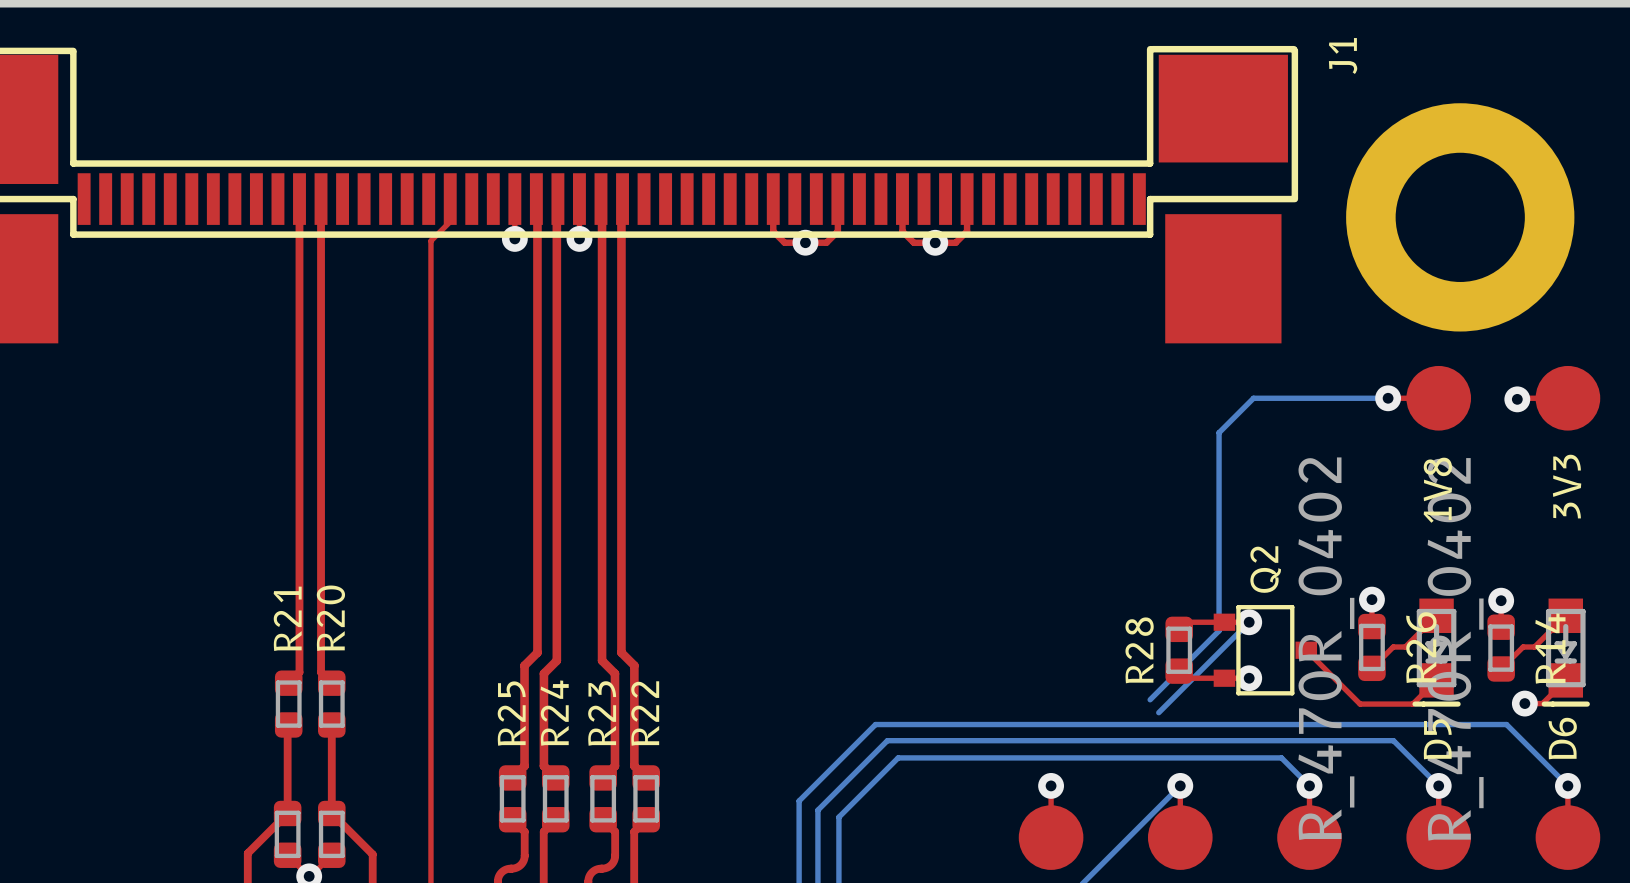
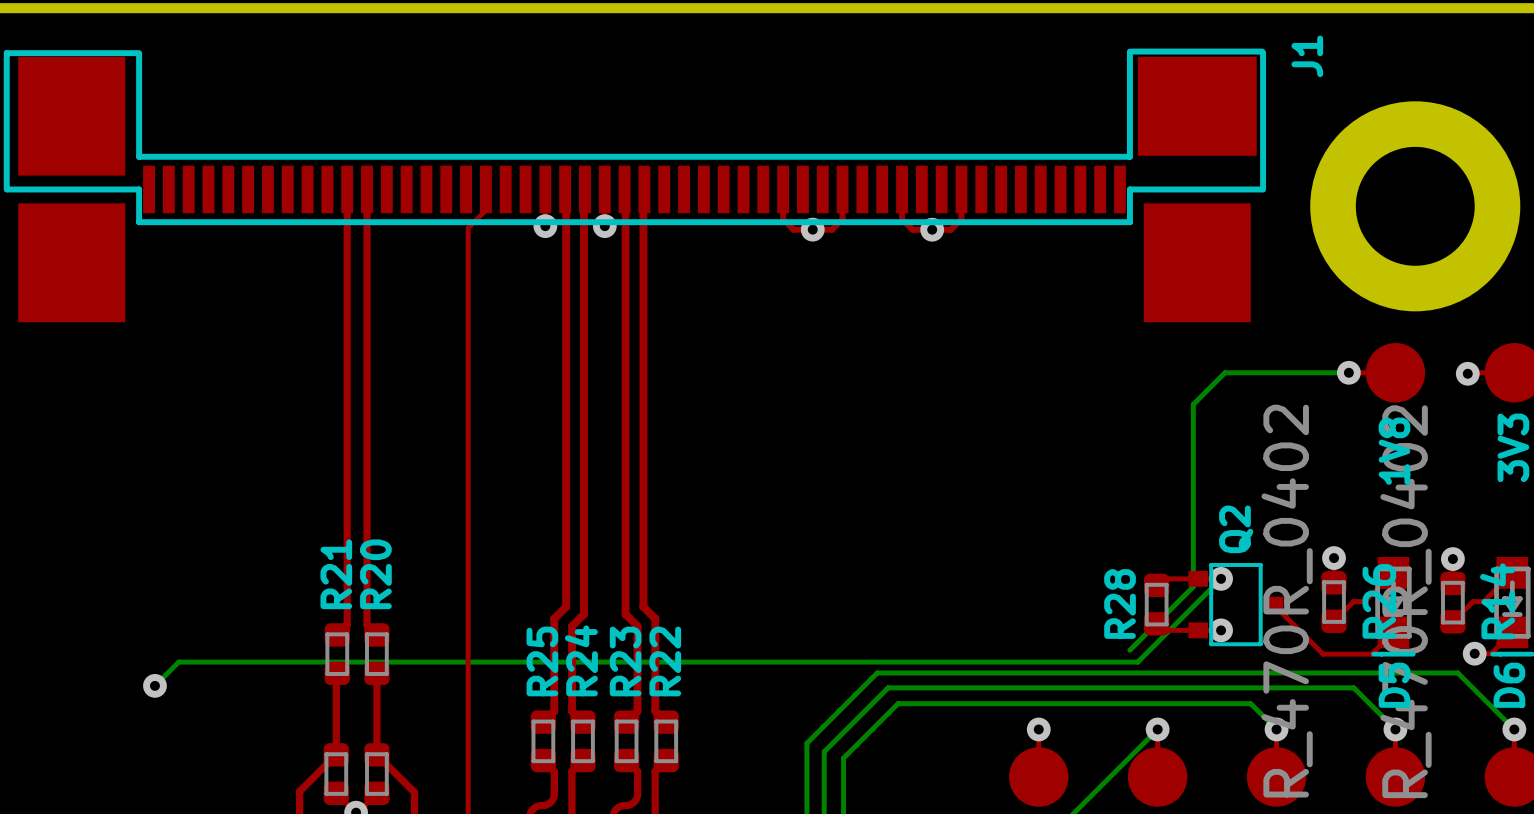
bottom track: none -> (1137, 662) (178, 662) (154, 685)
via: none -> (154, 685)

